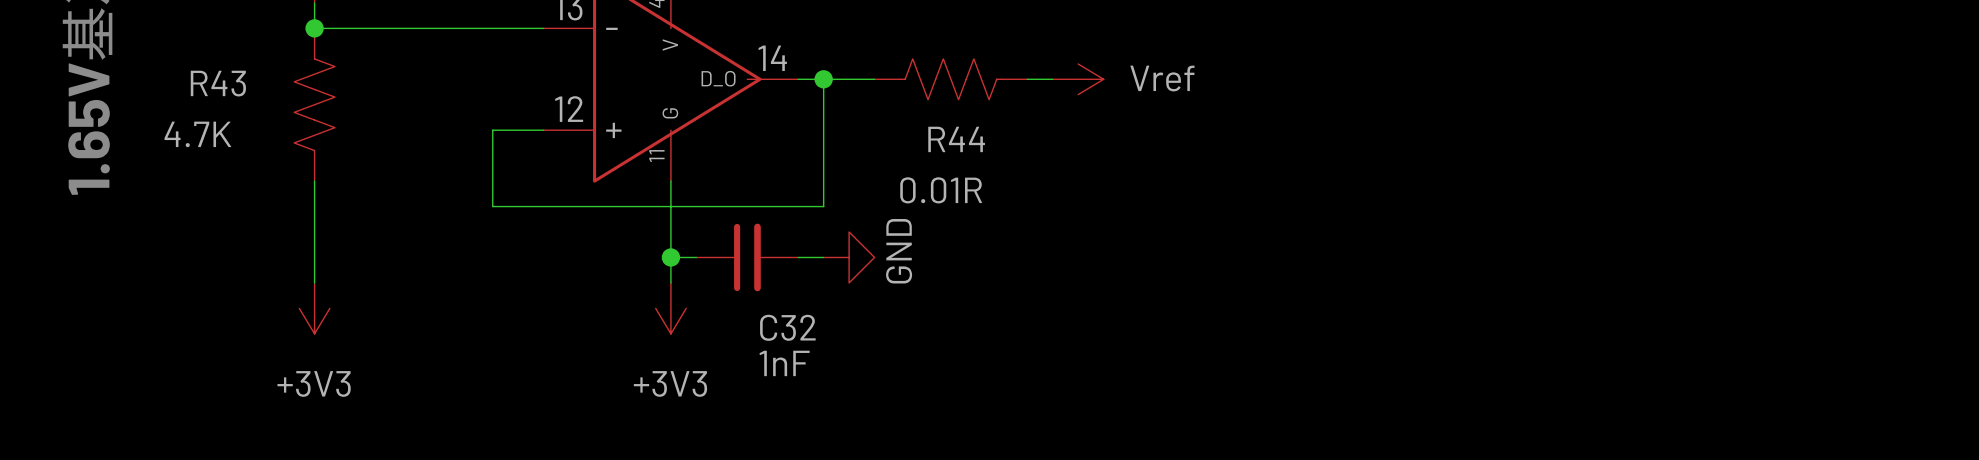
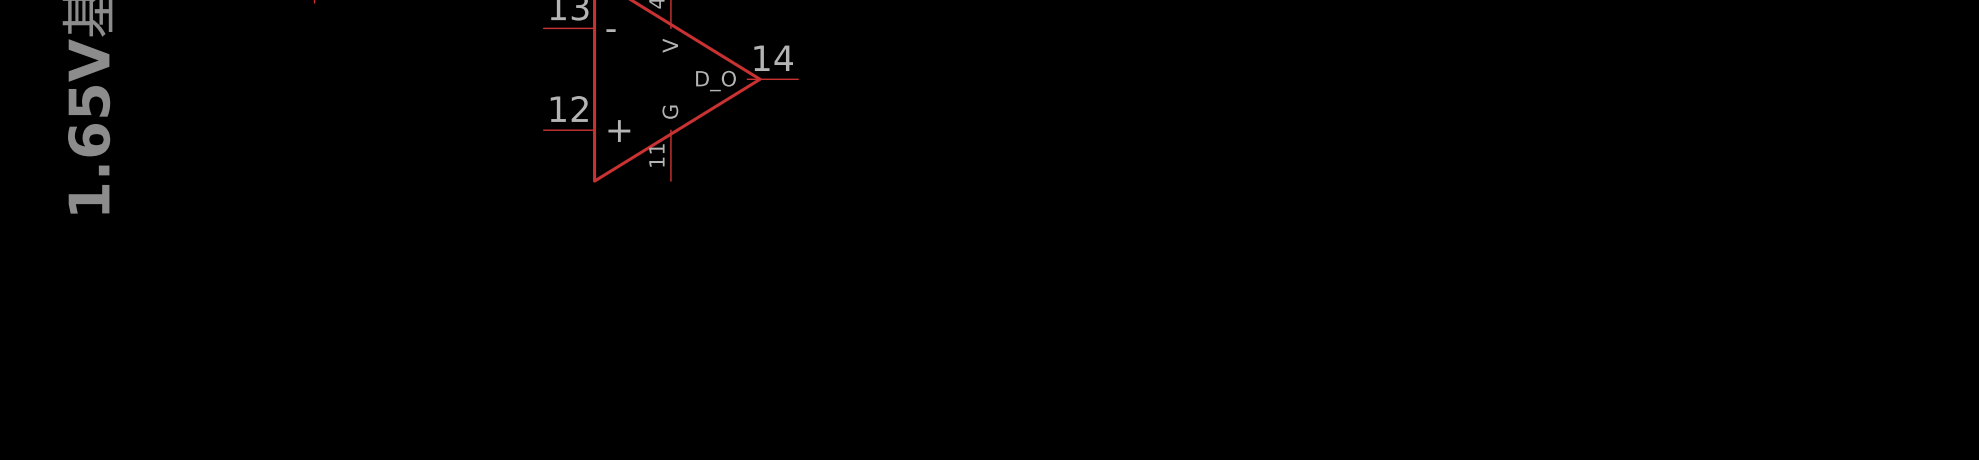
wire: (314, 2) (314, 28) (543, 28) -> none
junction: (314, 28) -> none
wire: (798, 79) (874, 79) -> none
wire: (823, 79) (823, 206) (492, 206) (492, 130) (543, 130) -> none
junction: (823, 79) -> none
R44: 0.01R (950, 79) -> none
wire: (1027, 79) (1052, 79) -> none
power symbol: Vref (1078, 79) -> none
R43: 4.7K (314, 104) -> none
wire: (314, 181) (314, 282) -> none
wire: (670, 181) (670, 282) -> none
wire: (670, 257) (696, 257) -> none
junction: (670, 257) -> none
C32: 1nF (747, 257) -> none
wire: (798, 257) (823, 257) -> none
power symbol: GND (849, 257) -> none
power symbol: +3V3 (314, 308) -> none
power symbol: +3V3 (670, 308) -> none

